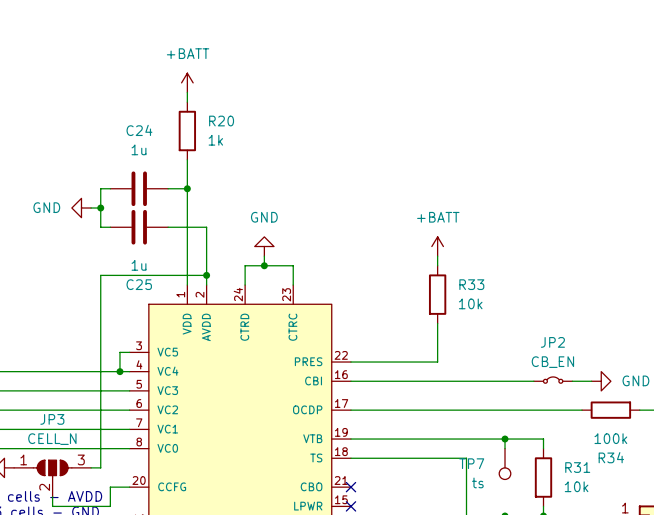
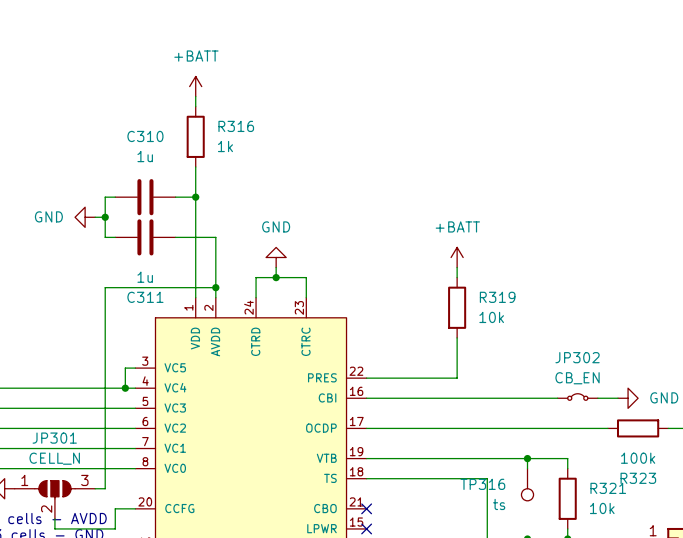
R20 name: R20 (221, 121) -> R316 (236, 126)
C24 name: C24 (139, 130) -> C310 (145, 136)
C25 name: C25 (139, 284) -> C311 (145, 297)
R33 name: R33 (471, 284) -> R319 (497, 297)
JP2 name: JP2 (552, 342) -> JP302 (577, 357)
JP3 name: JP3 (52, 419) -> JP301 (54, 438)
R34 name: R34 (611, 457) -> R323 (638, 478)
TP7 name: TP7 (471, 463) -> TP316 (482, 484)
R31 name: R31 (577, 467) -> R321 (608, 488)

